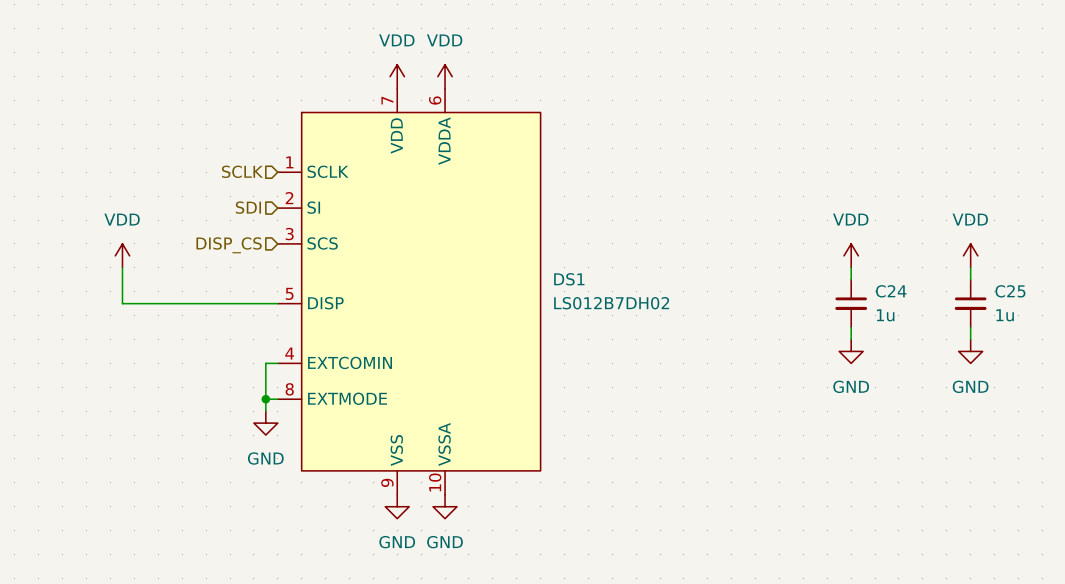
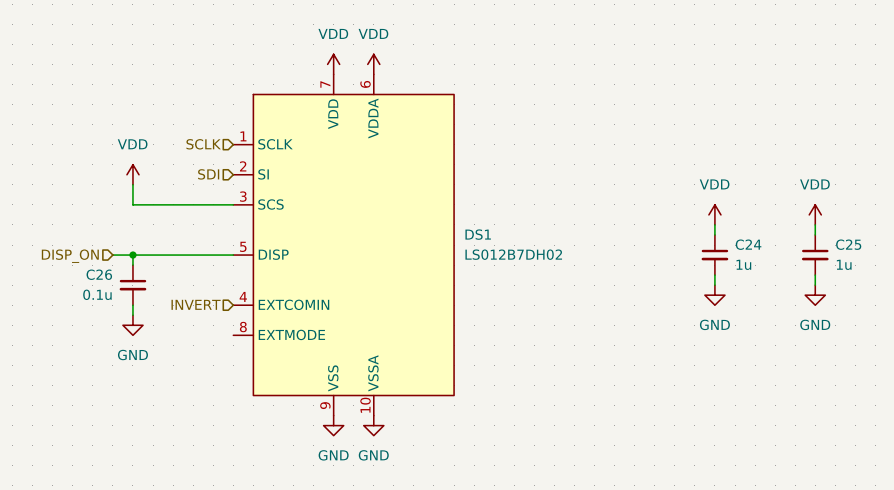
wire: none -> (132, 184) (132, 204) (233, 204)
hierarchical label: DISP_CS (229, 245) -> none
power symbol position: VDD (122, 255) -> VDD (132, 174)
wire: (122, 267) (122, 303) (134, 303) -> none
wire: none -> (132, 255) (132, 265)
junction: none -> (132, 255)
hierarchical label: none -> DISP_ON (70, 256)
C26: none -> 0.1u (132, 285)
hierarchical label: none -> INVERT (196, 304)
wire: none -> (132, 305) (132, 315)
wire: (277, 363) (265, 363) (265, 411) -> none
wire: (265, 399) (277, 399) -> none
junction: (265, 399) -> none
power symbol position: GND (265, 423) -> GND (132, 325)

